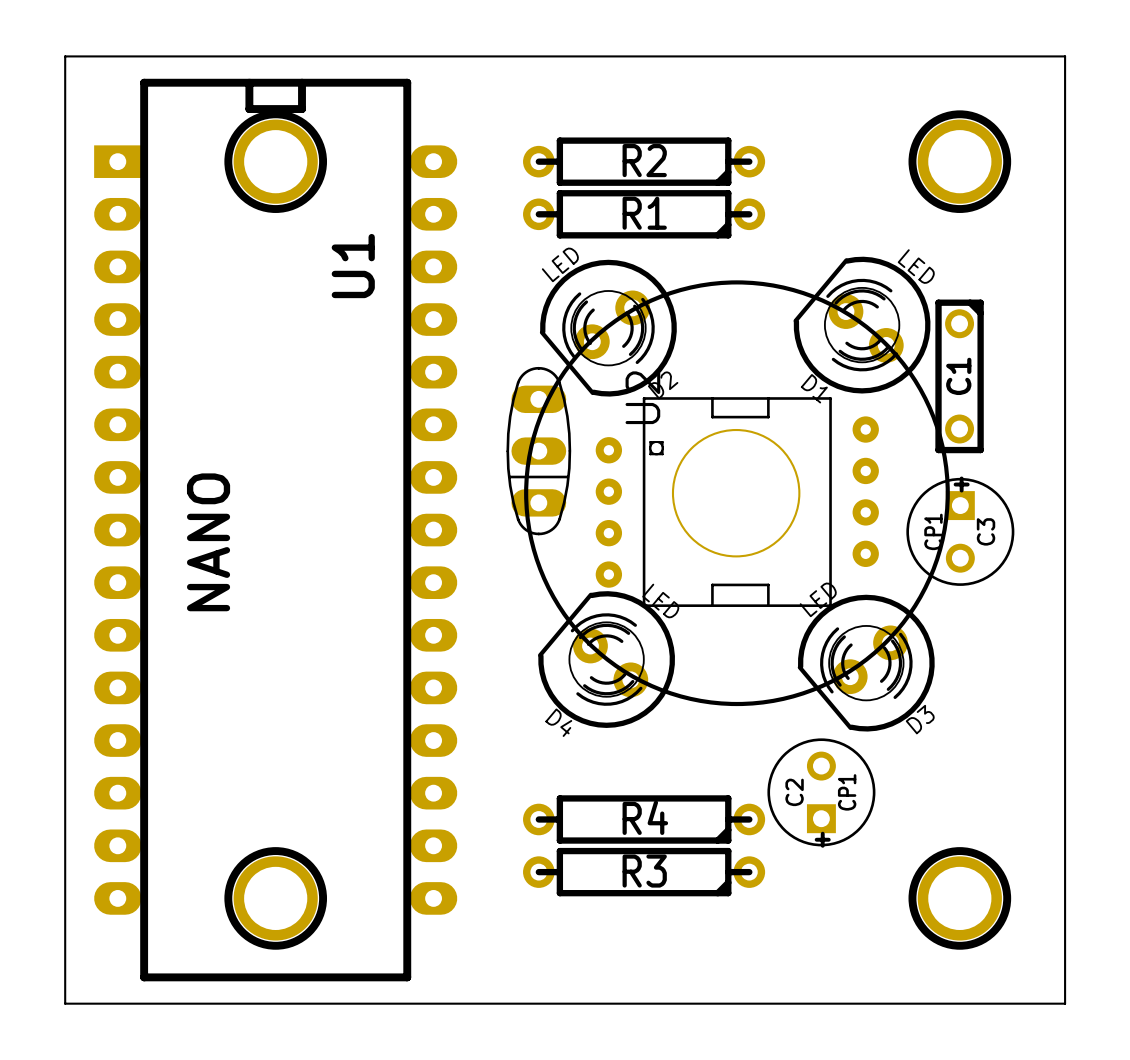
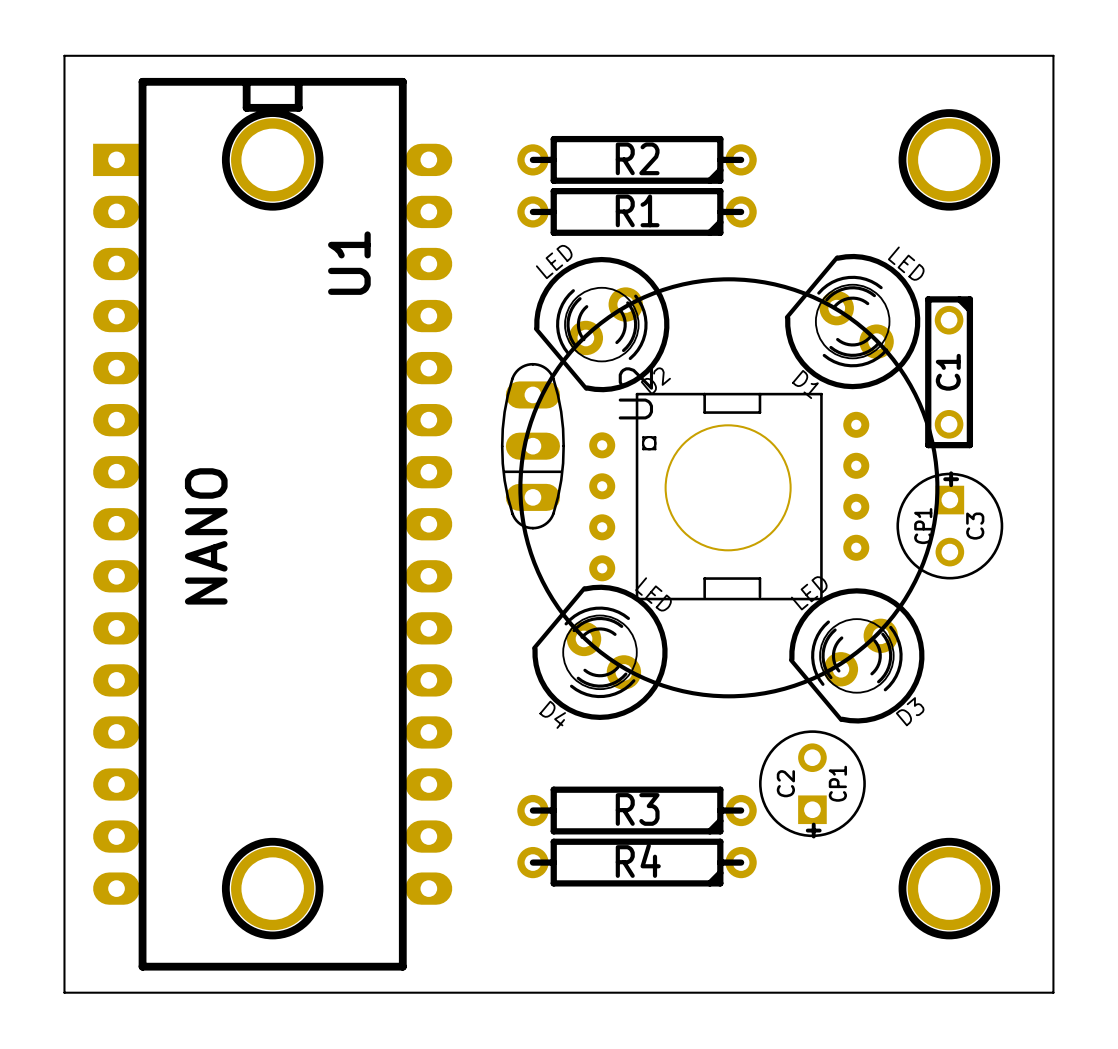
R4 name: R4 (645, 817) -> R3 (637, 809)
R3 name: R3 (644, 871) -> R4 (638, 860)

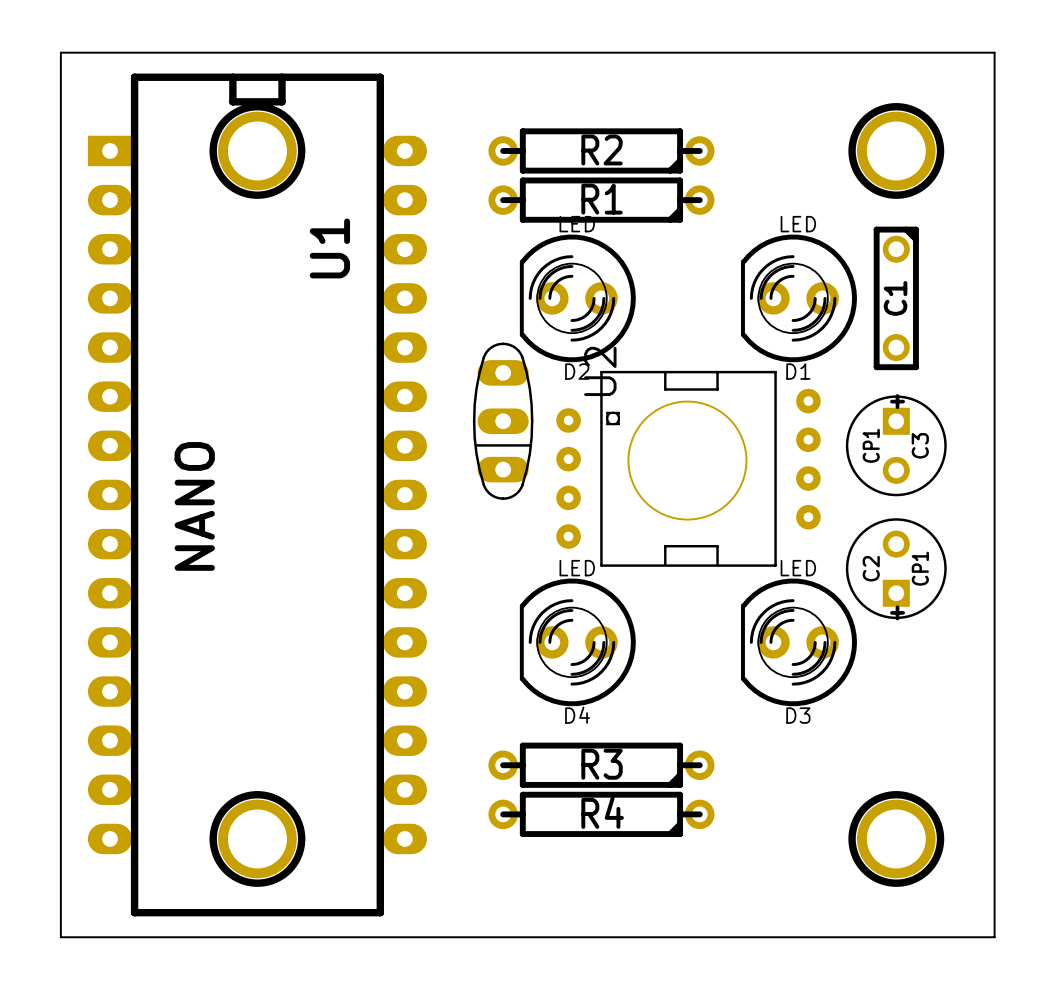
drawing: [518, 277, 940, 699] -> none
D1 rotation: 0° (852, 321) -> 40° counterclockwise (799, 298)
D2 rotation: 0° (601, 324) -> 40° clockwise (577, 298)
C1 position: (949, 372) -> (896, 298)
C3 position: (949, 526) -> (896, 445)
D4 rotation: 0° (599, 652) -> 40° counterclockwise (577, 642)
D3 rotation: 0° (856, 655) -> 40° clockwise (799, 642)
C2 position: (812, 783) -> (896, 568)

